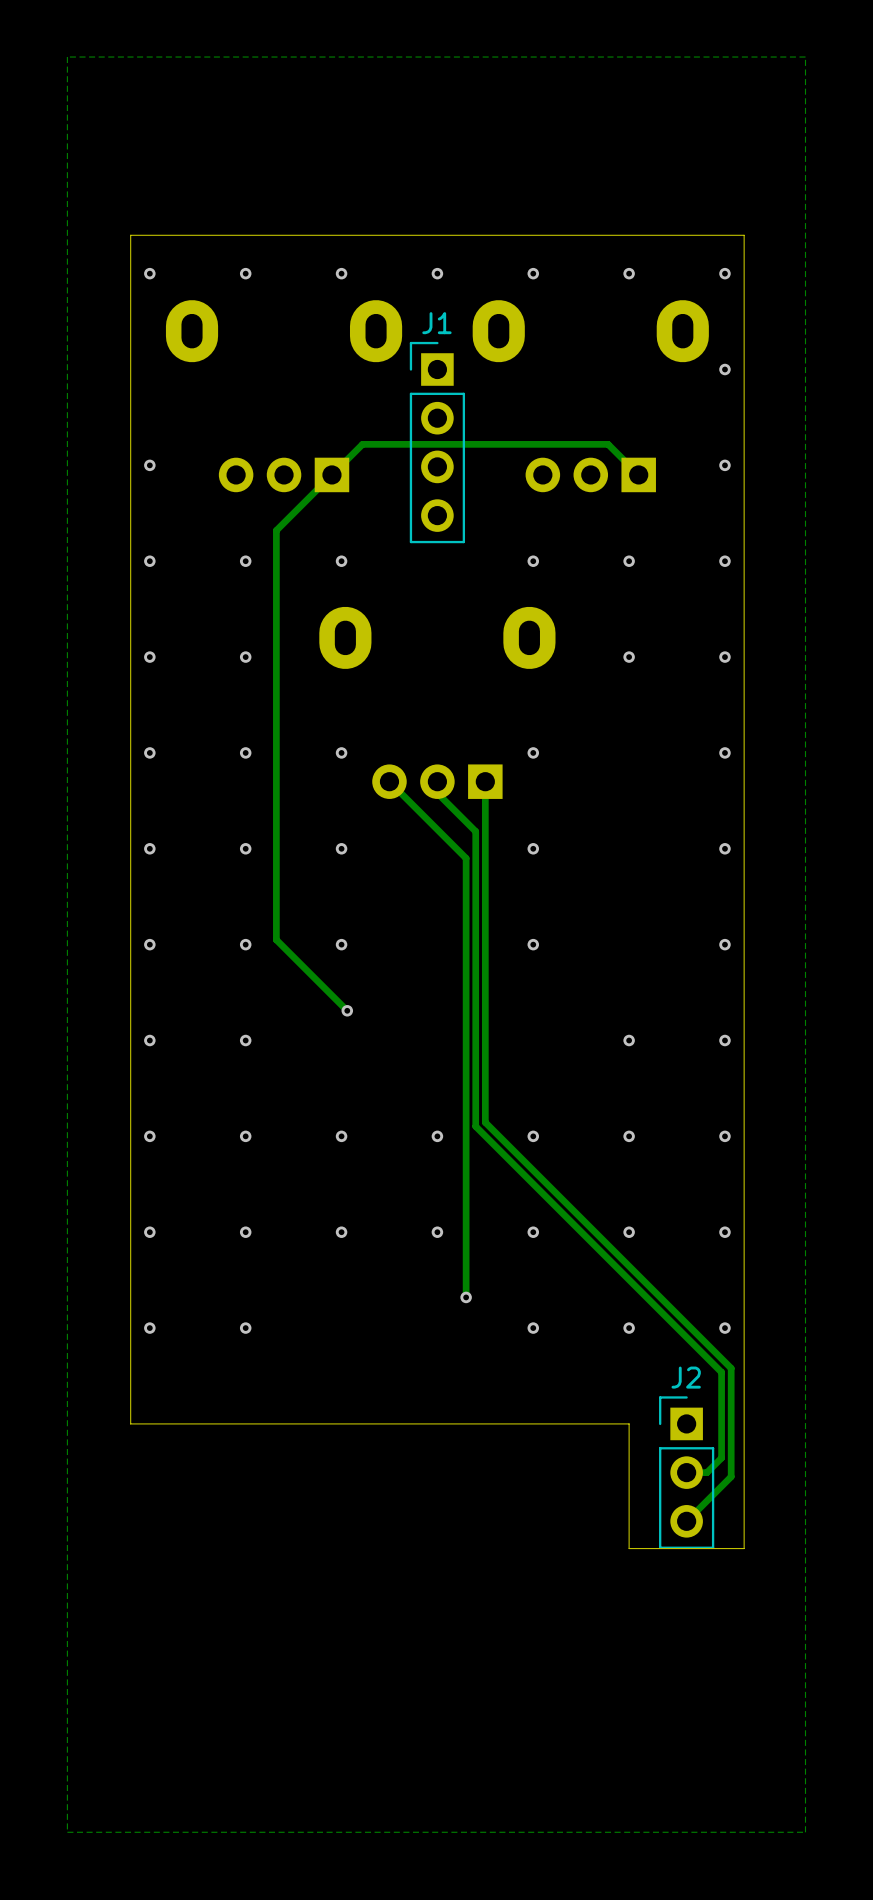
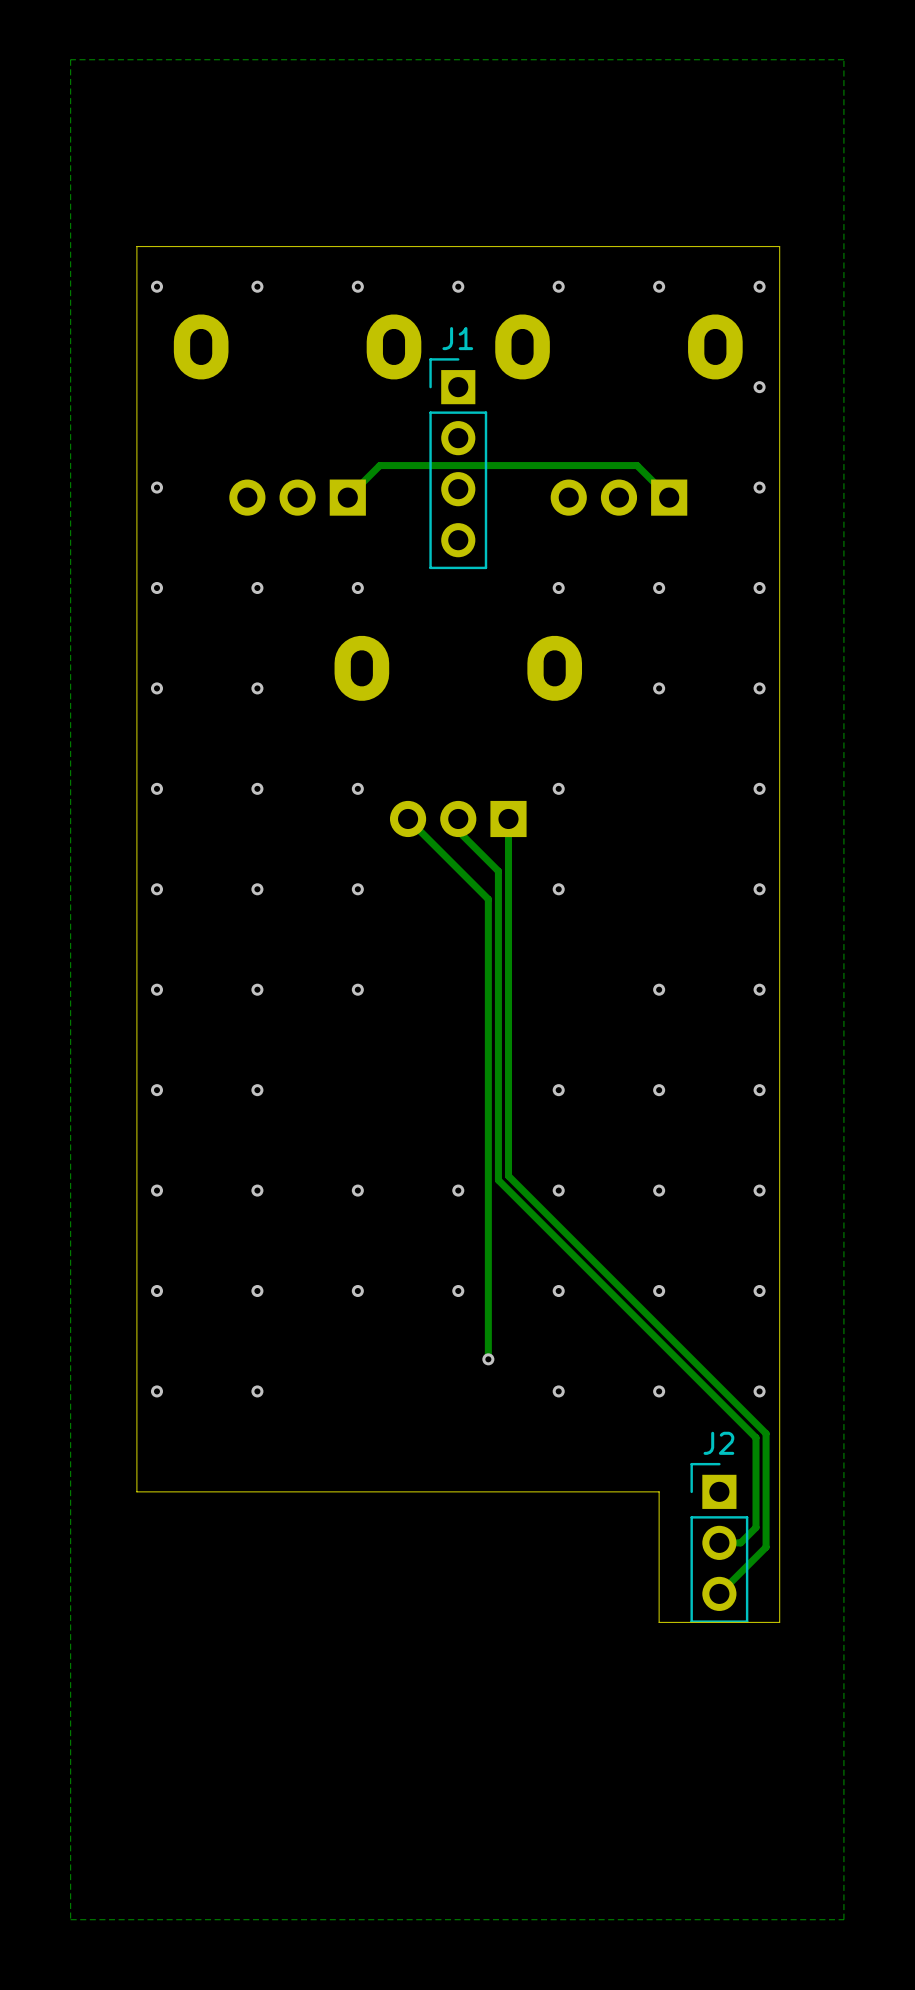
track: (331, 474) (276, 530) (276, 939) (347, 1010) -> none
via: (533, 944) -> none
via: none -> (659, 989)
via: (347, 1010) -> none
via: none -> (558, 1090)

